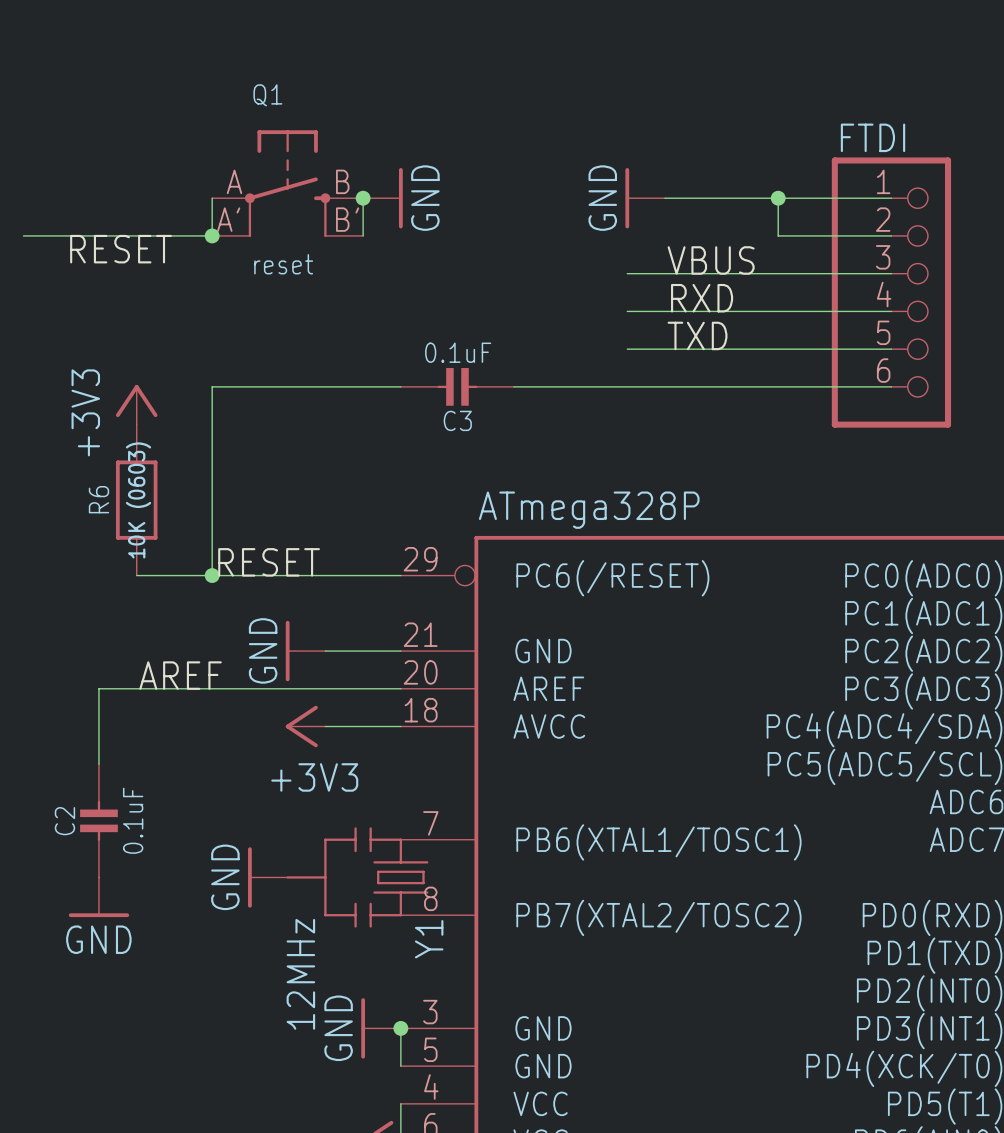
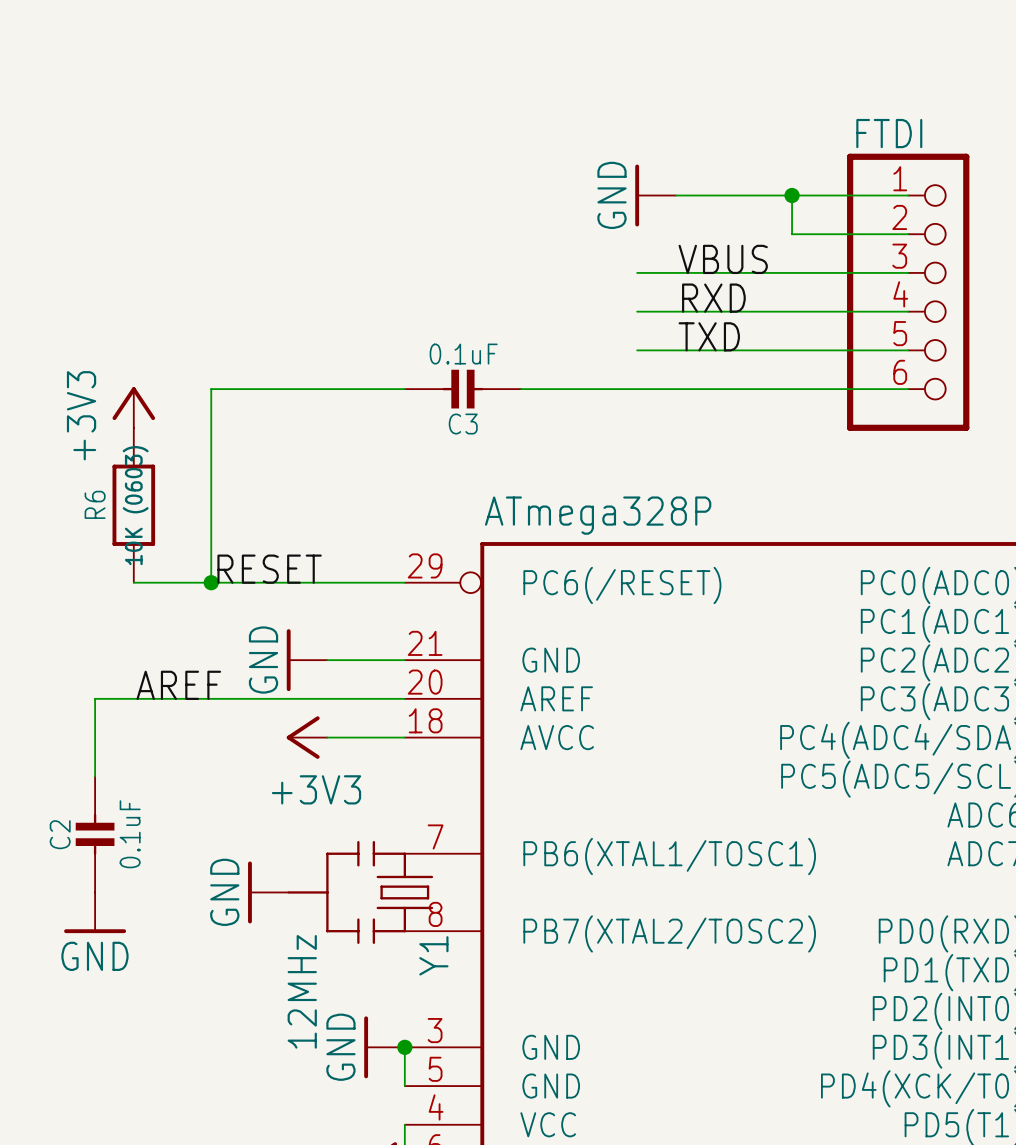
Q1: reset (287, 183) -> none
wire: (212, 198) (212, 235) (23, 235) -> none
wire: (363, 198) (363, 235) -> none
junction: (363, 198) -> none
power symbol: GND (382, 198) -> none
junction: (212, 235) -> none
label: RESET (120, 249) -> none

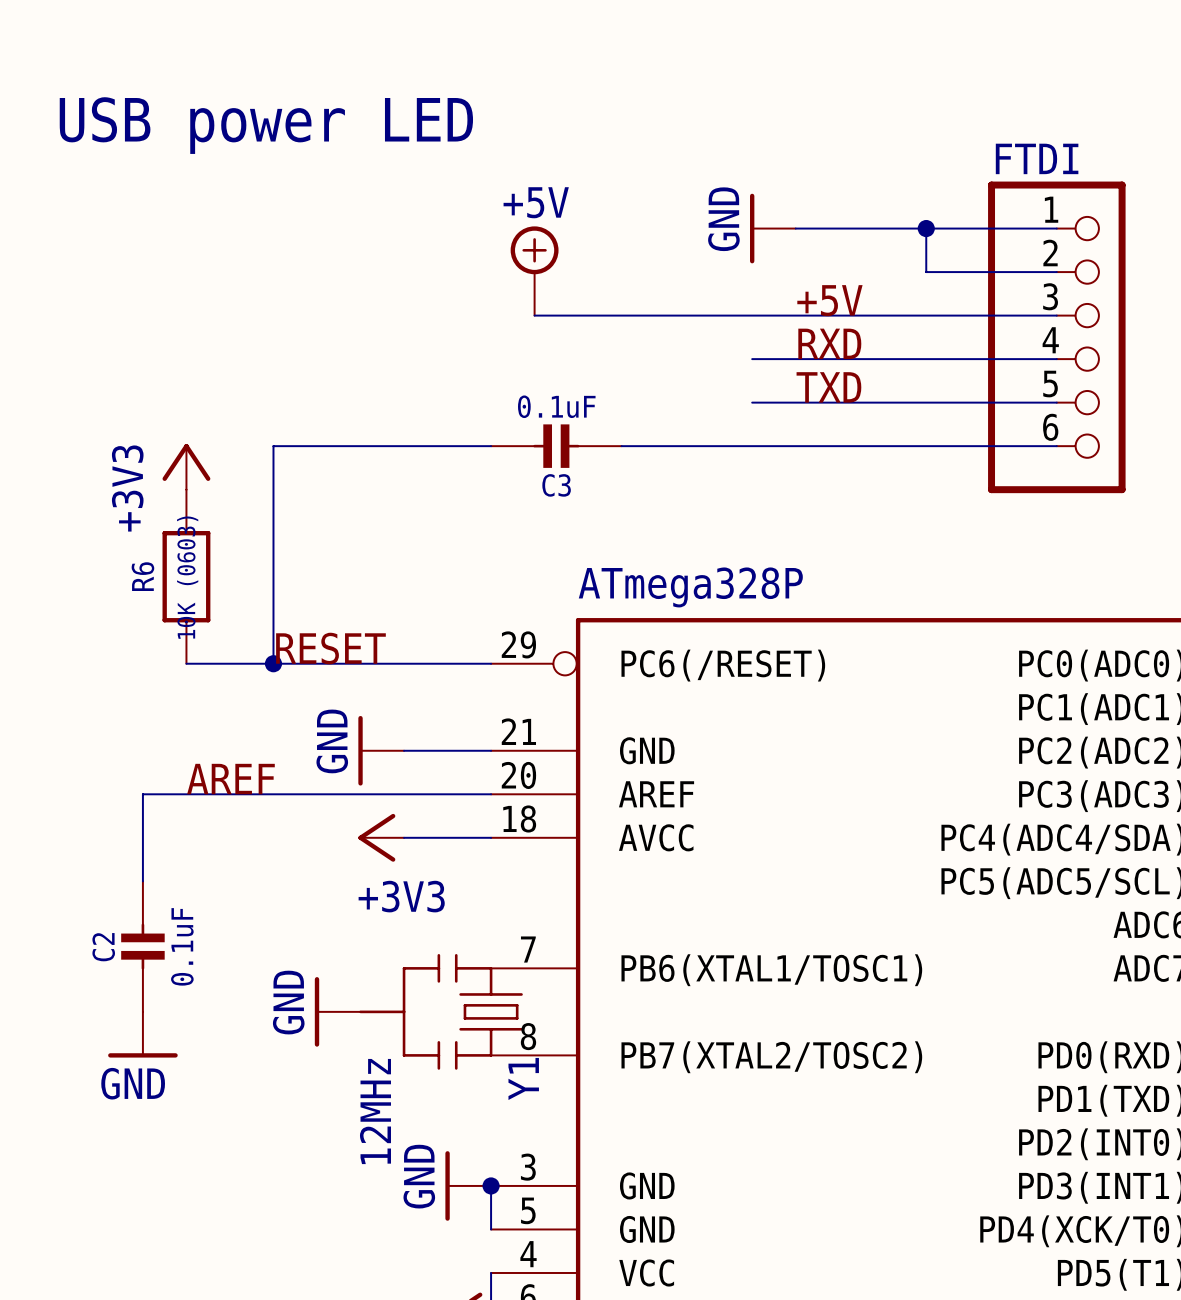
text: none -> USB power LED (266, 125)
power symbol: none -> +5V (534, 270)
label: VBUS (723, 259) -> +5V (829, 300)
wire: none -> (534, 315) (752, 315)

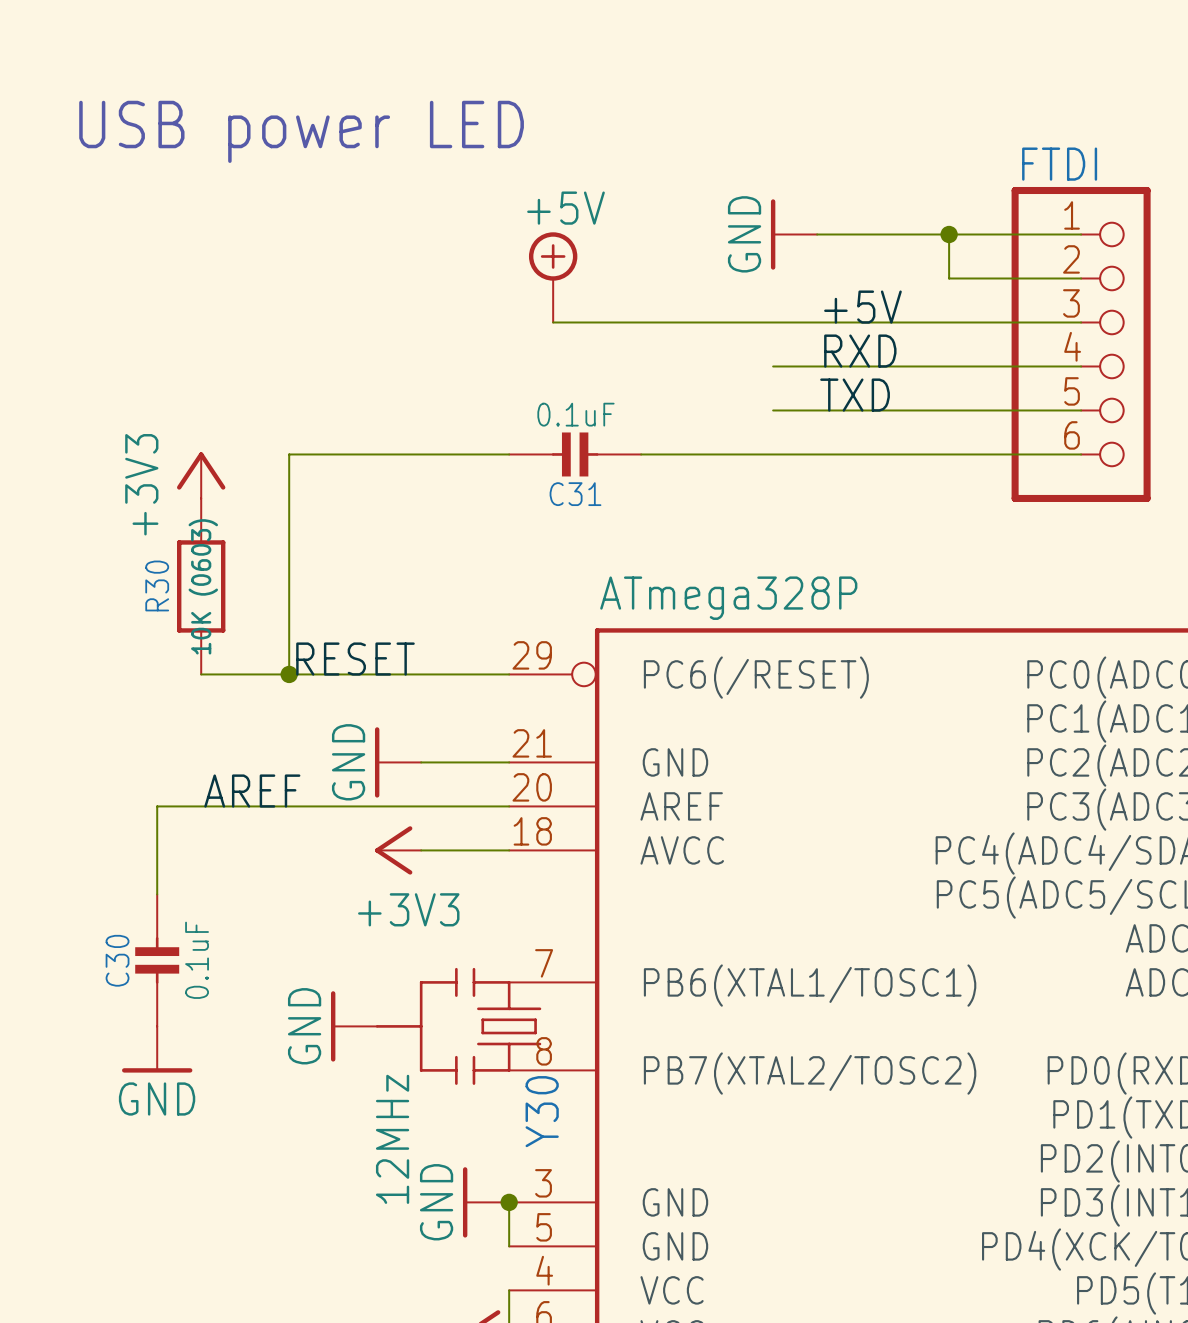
C3 name: C3 (556, 485) -> C31 (575, 494)
R6 name: R6 (142, 576) -> R30 (157, 585)
C2 name: C2 (103, 947) -> C30 (117, 960)
Y1 name: Y1 (523, 1078) -> Y30 (542, 1111)

